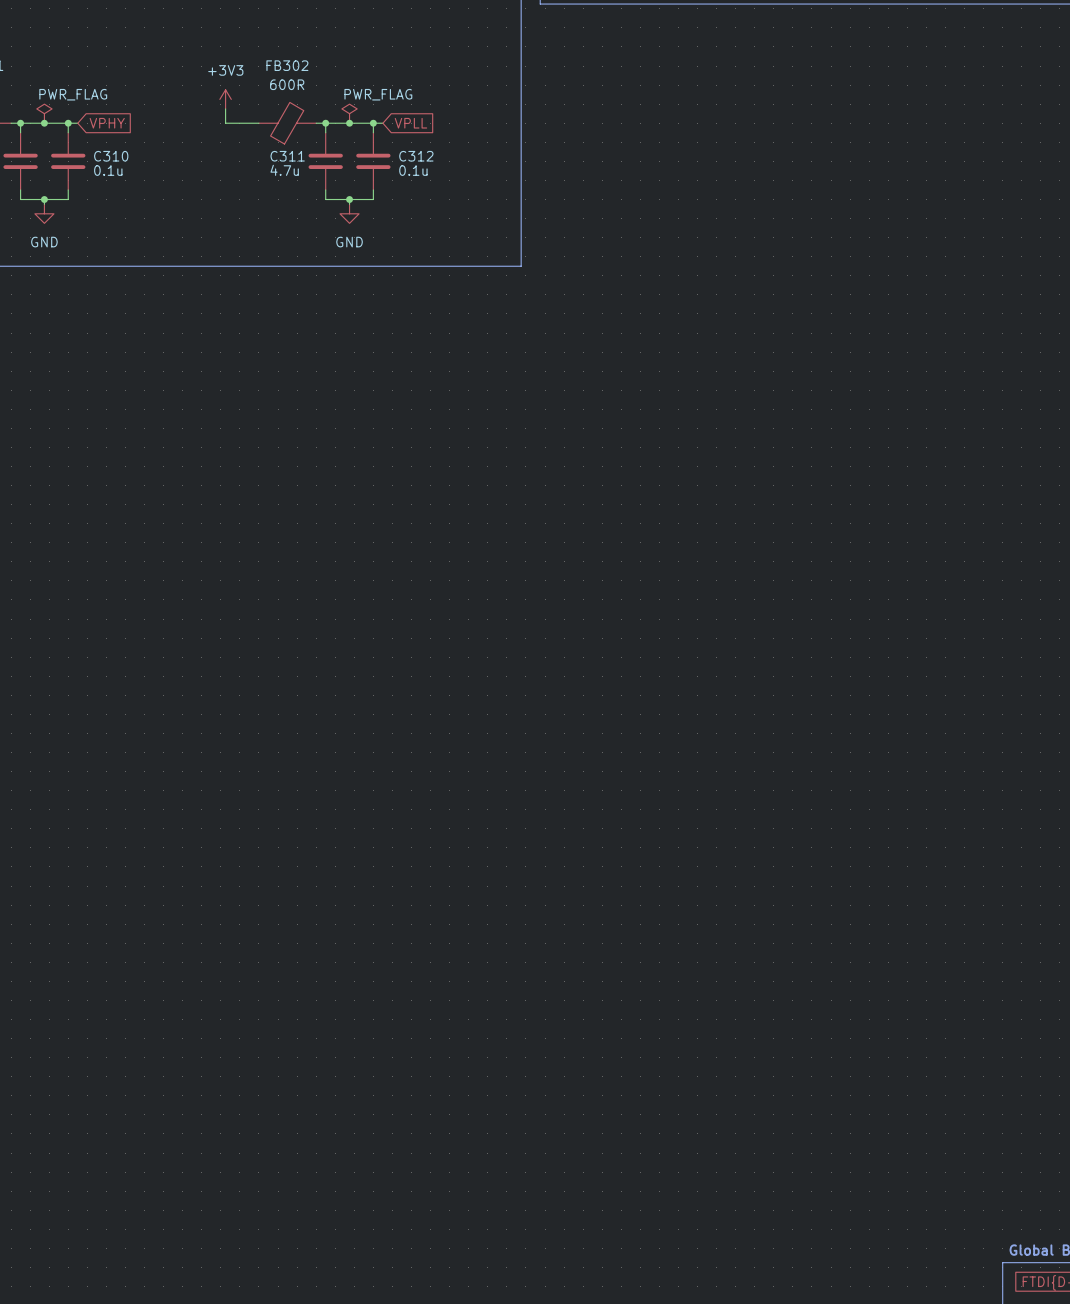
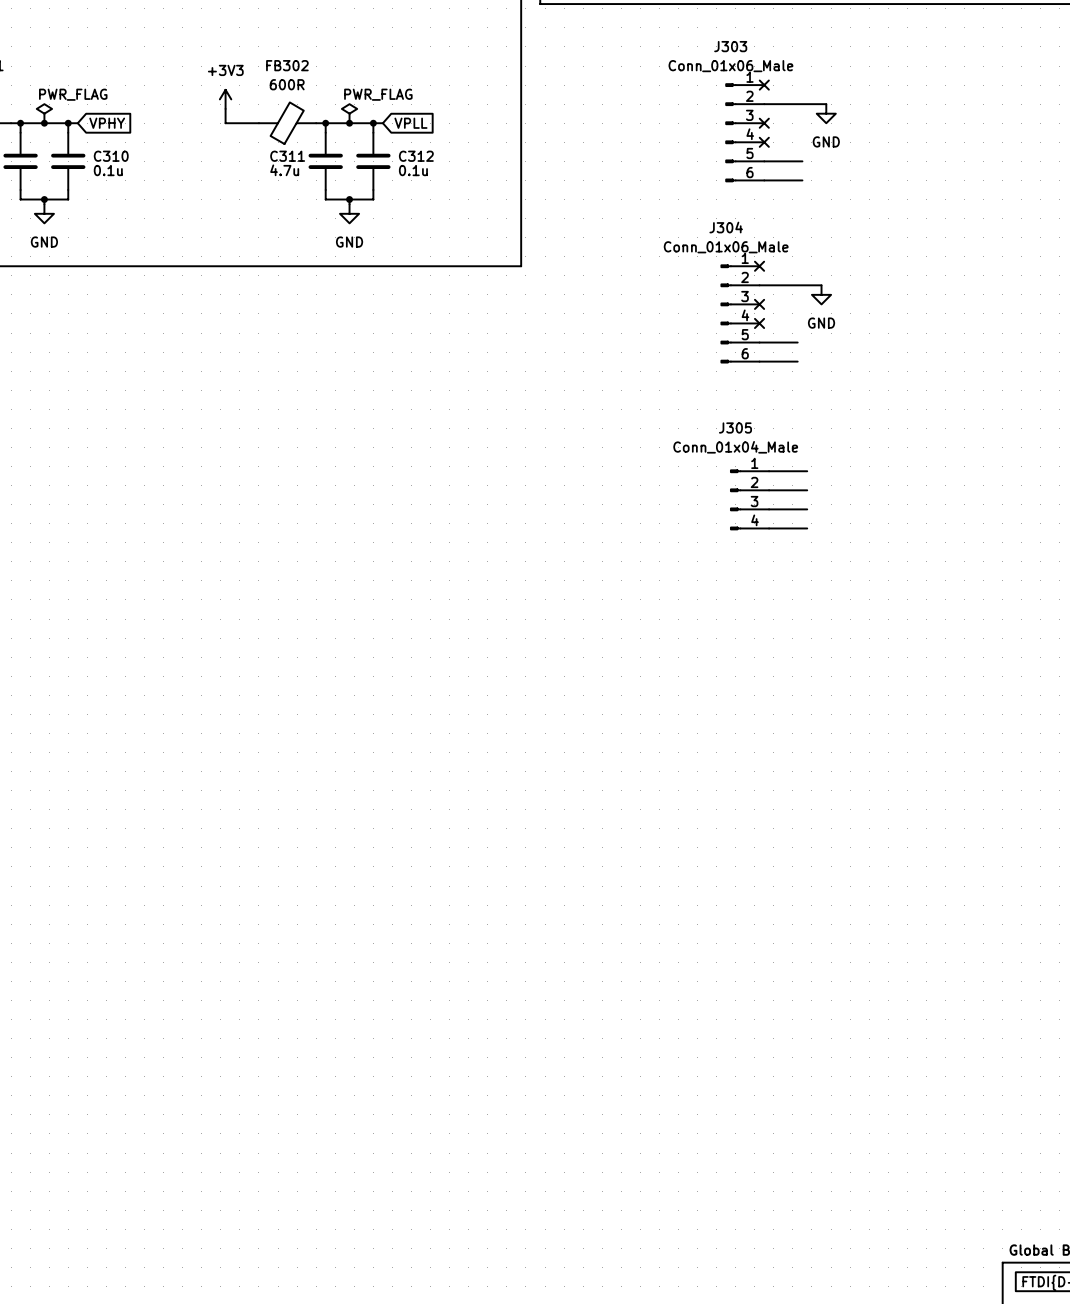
no-connect mark: none -> (764, 85)
wire: none -> (764, 104) (826, 104)
power symbol: none -> GND (826, 113)
no-connect mark: none -> (764, 123)
J303: none -> Conn_01x06_Male (744, 132)
no-connect mark: none -> (764, 142)
wire: none -> (764, 161) (802, 161)
wire: none -> (764, 180) (802, 180)
no-connect mark: none -> (759, 266)
wire: none -> (759, 285) (821, 285)
power symbol: none -> GND (821, 294)
no-connect mark: none -> (759, 304)
J304: none -> Conn_01x06_Male (740, 313)
no-connect mark: none -> (759, 323)
wire: none -> (759, 342) (797, 342)
wire: none -> (759, 361) (797, 361)
wire: none -> (769, 471) (807, 471)
wire: none -> (769, 490) (807, 490)
J305: none -> Conn_01x04_Male (749, 499)
wire: none -> (769, 509) (807, 509)
wire: none -> (769, 528) (807, 528)

